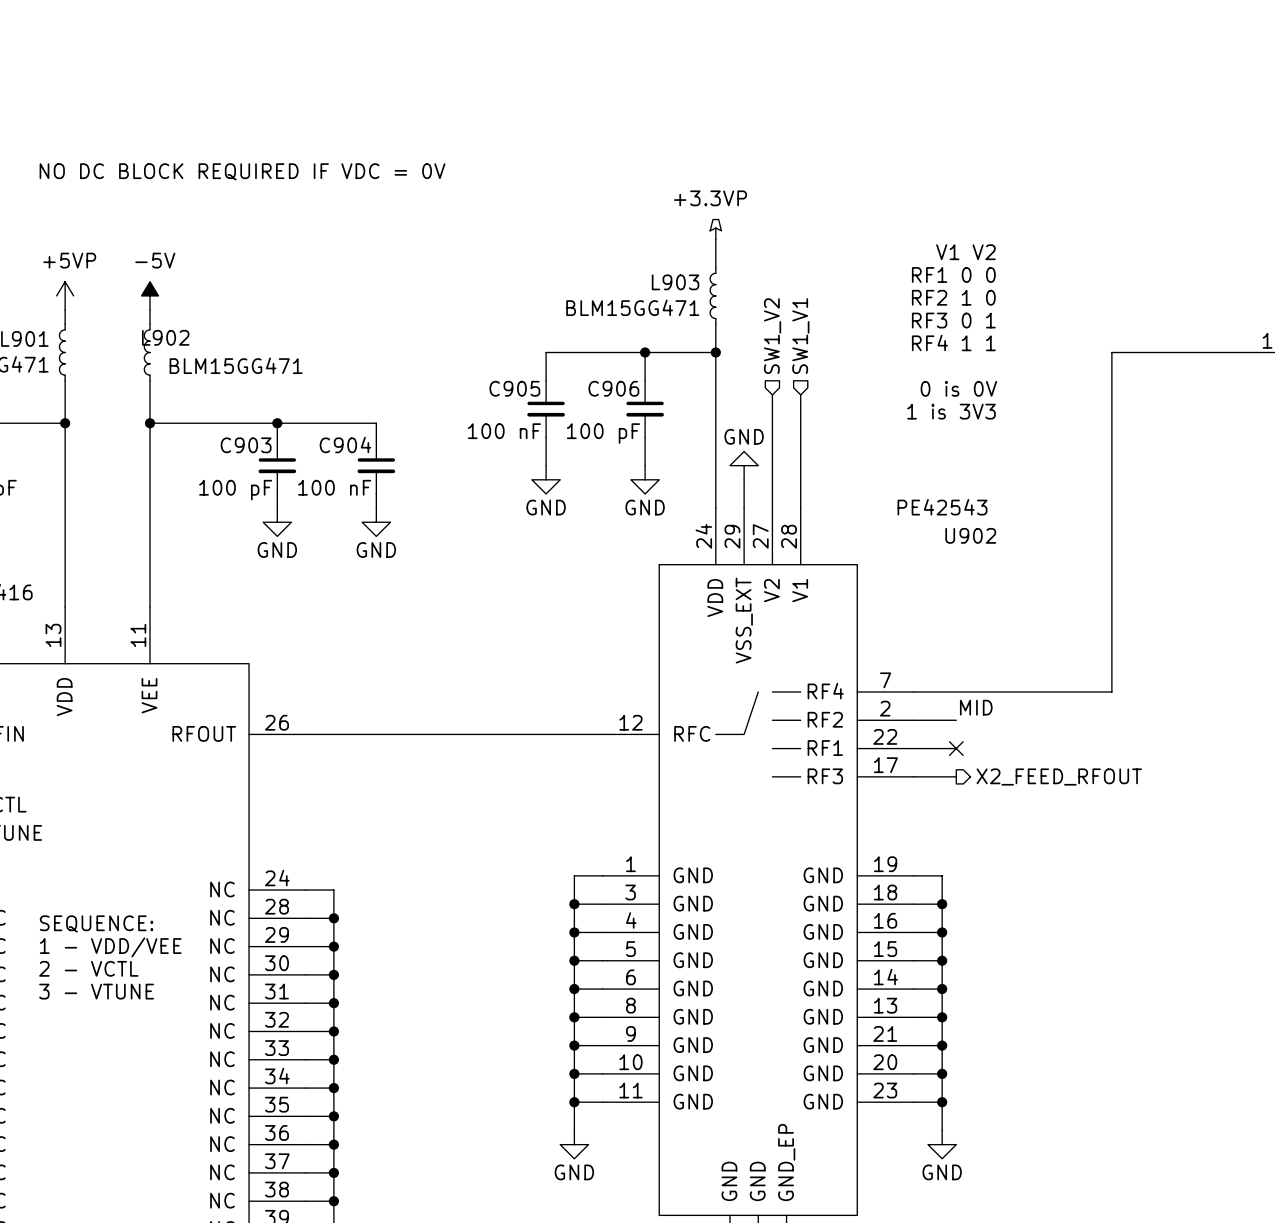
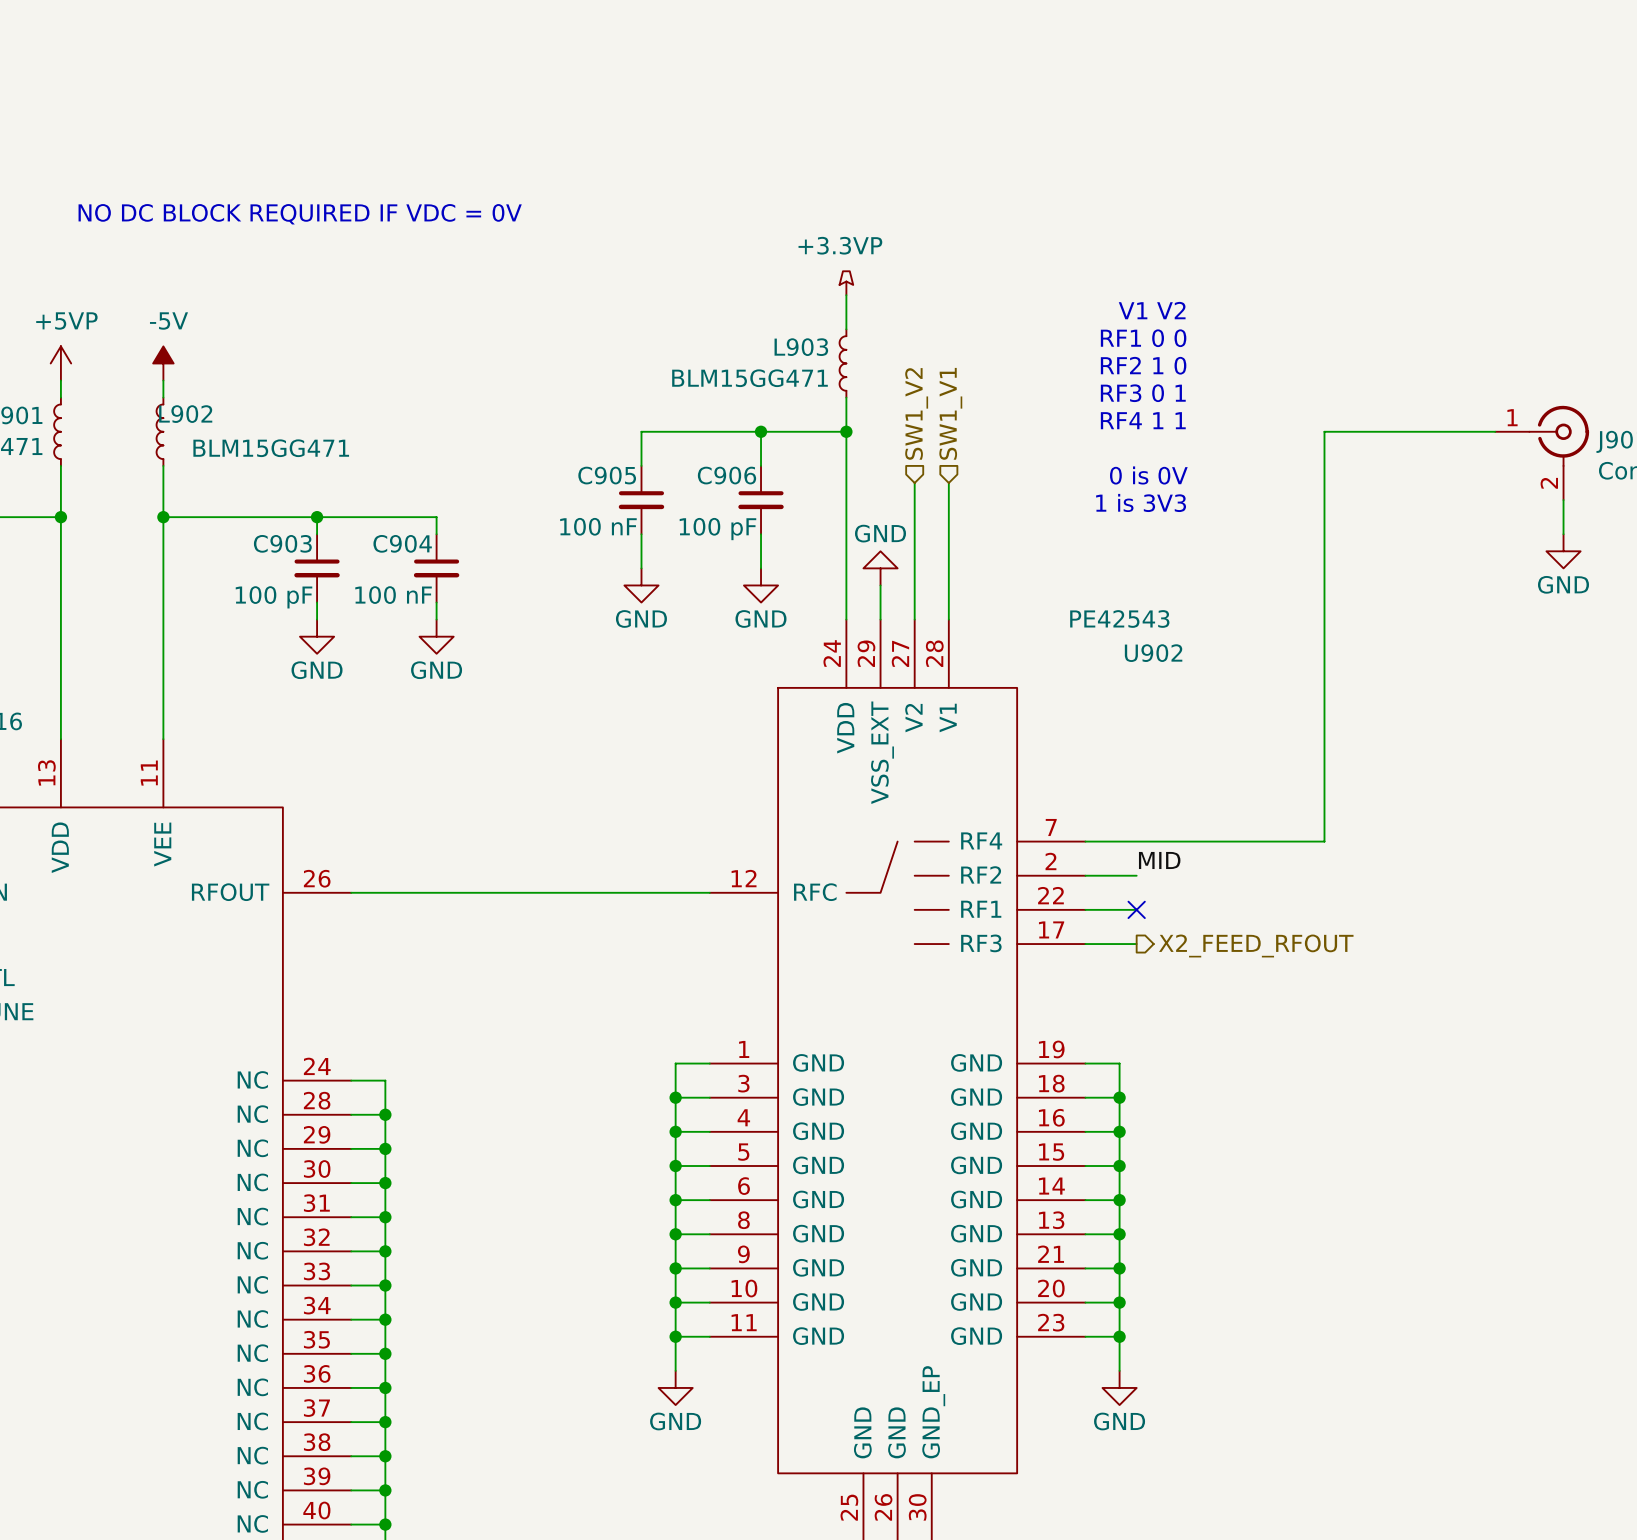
text: SEQUENCE: (96, 923) -> none
text: 1 - VDD/VEE (110, 947) -> none
text: 2 - VCTL (88, 968) -> none
text: 3 - VTUNE (96, 991) -> none

